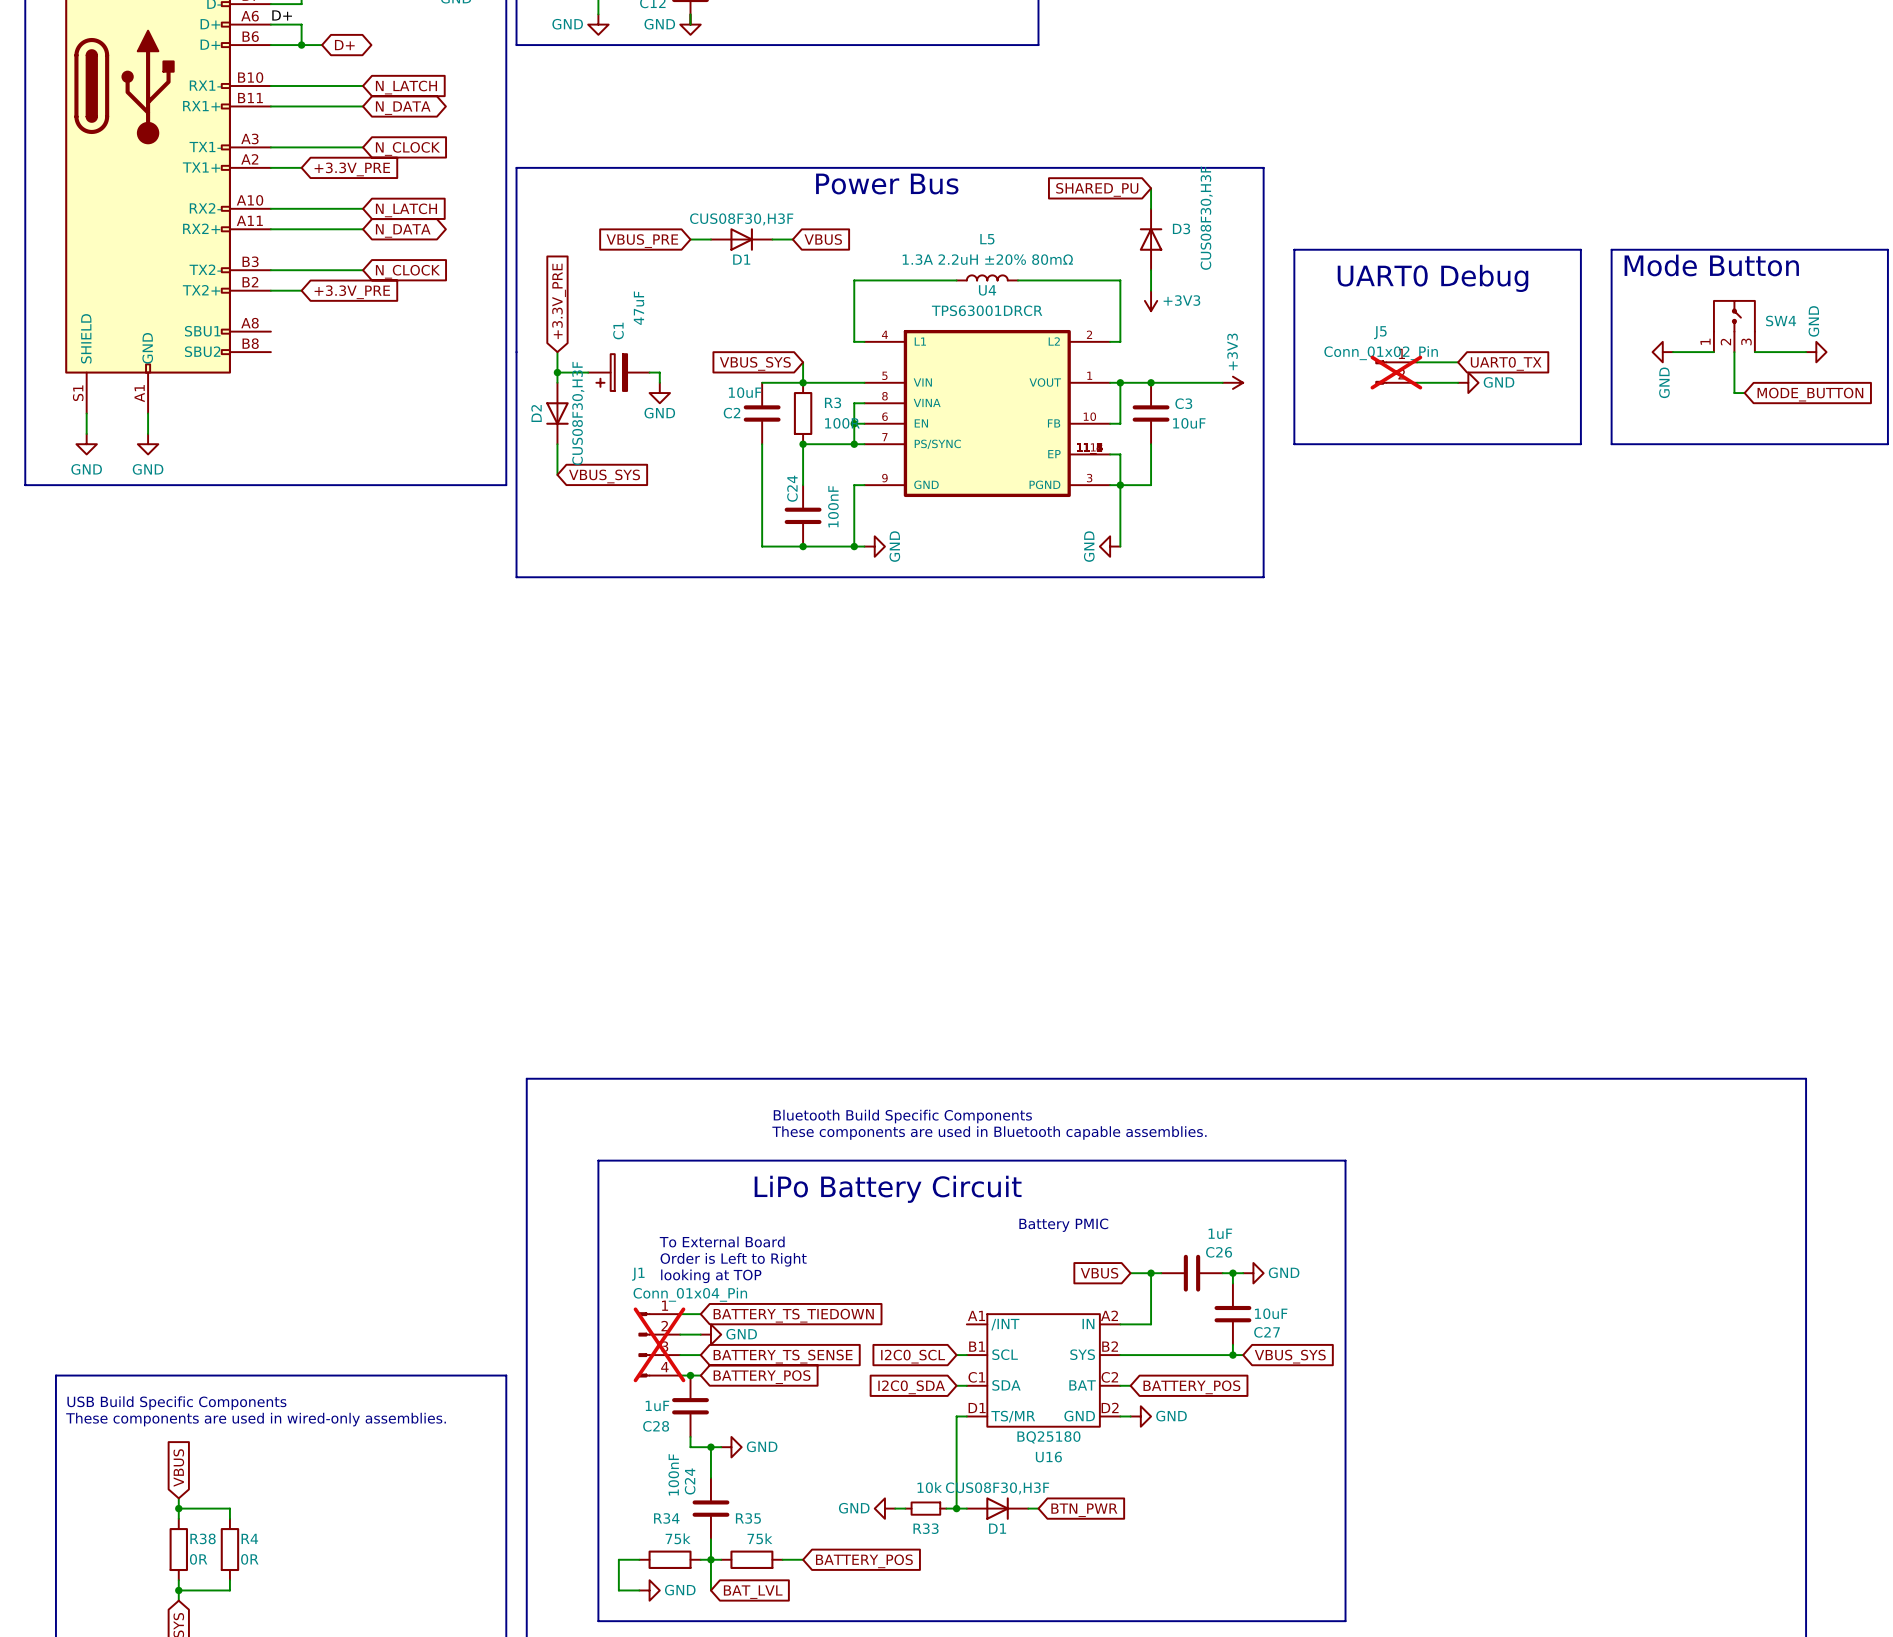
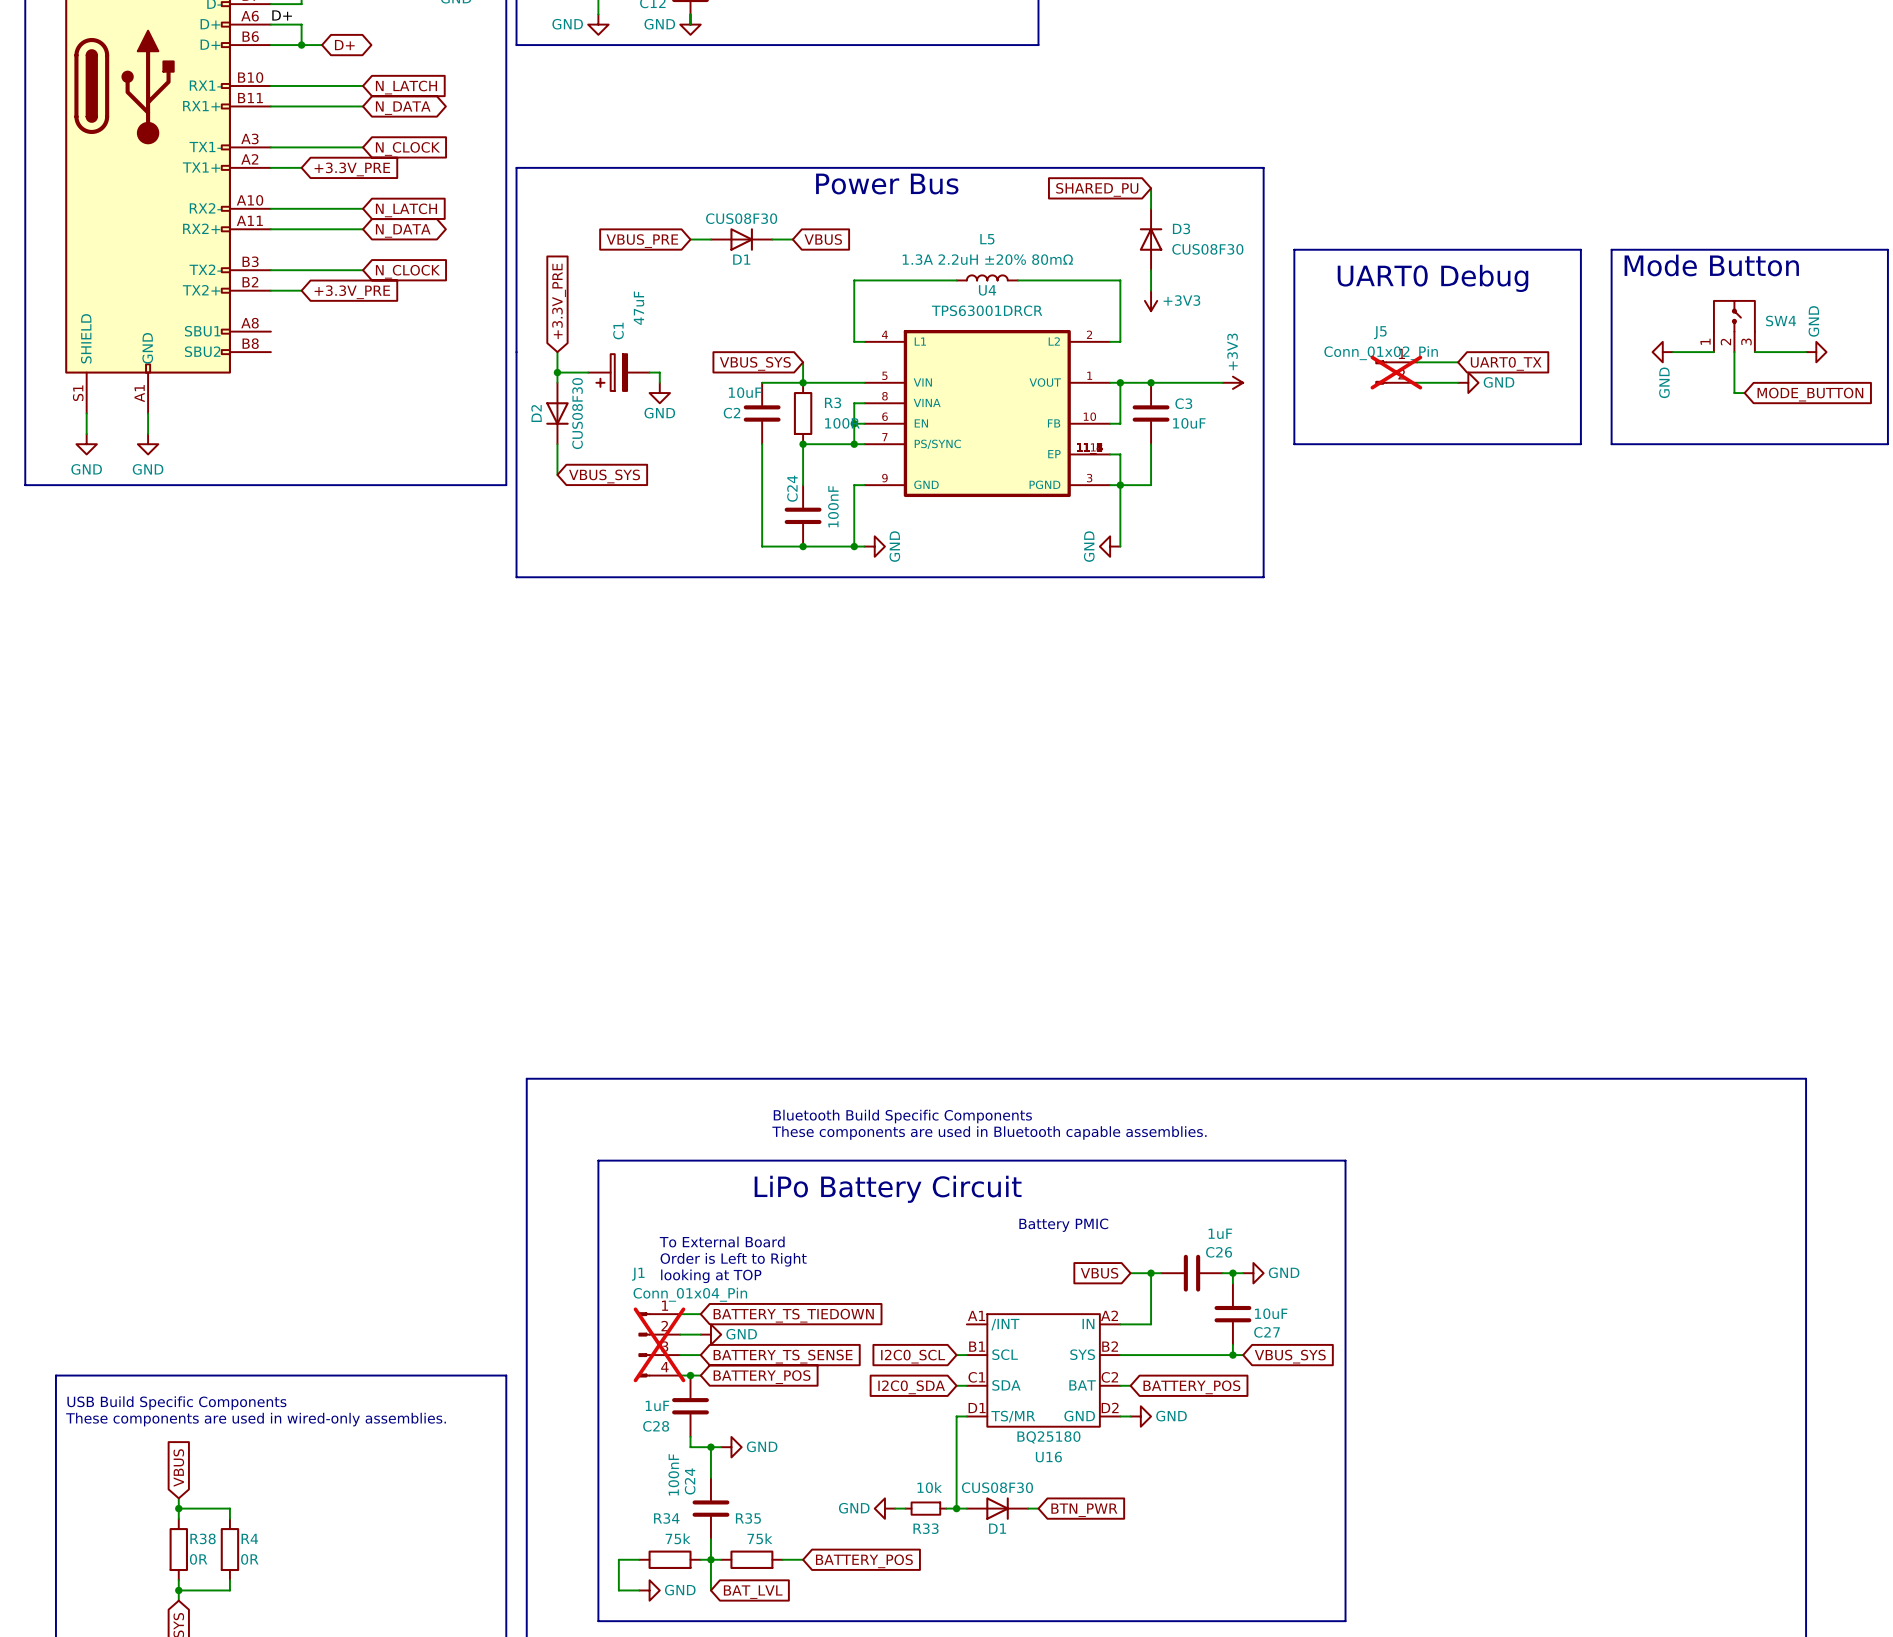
D3 value: CUS08F30,H3F (1206, 218) -> CUS08F30 (1207, 249)
D1 value: CUS08F30,H3F (741, 219) -> CUS08F30 (741, 218)
D2 value: CUS08F30,H3F (578, 413) -> CUS08F30 (577, 413)
D1 value: CUS08F30,H3F (997, 1488) -> CUS08F30 (997, 1487)

